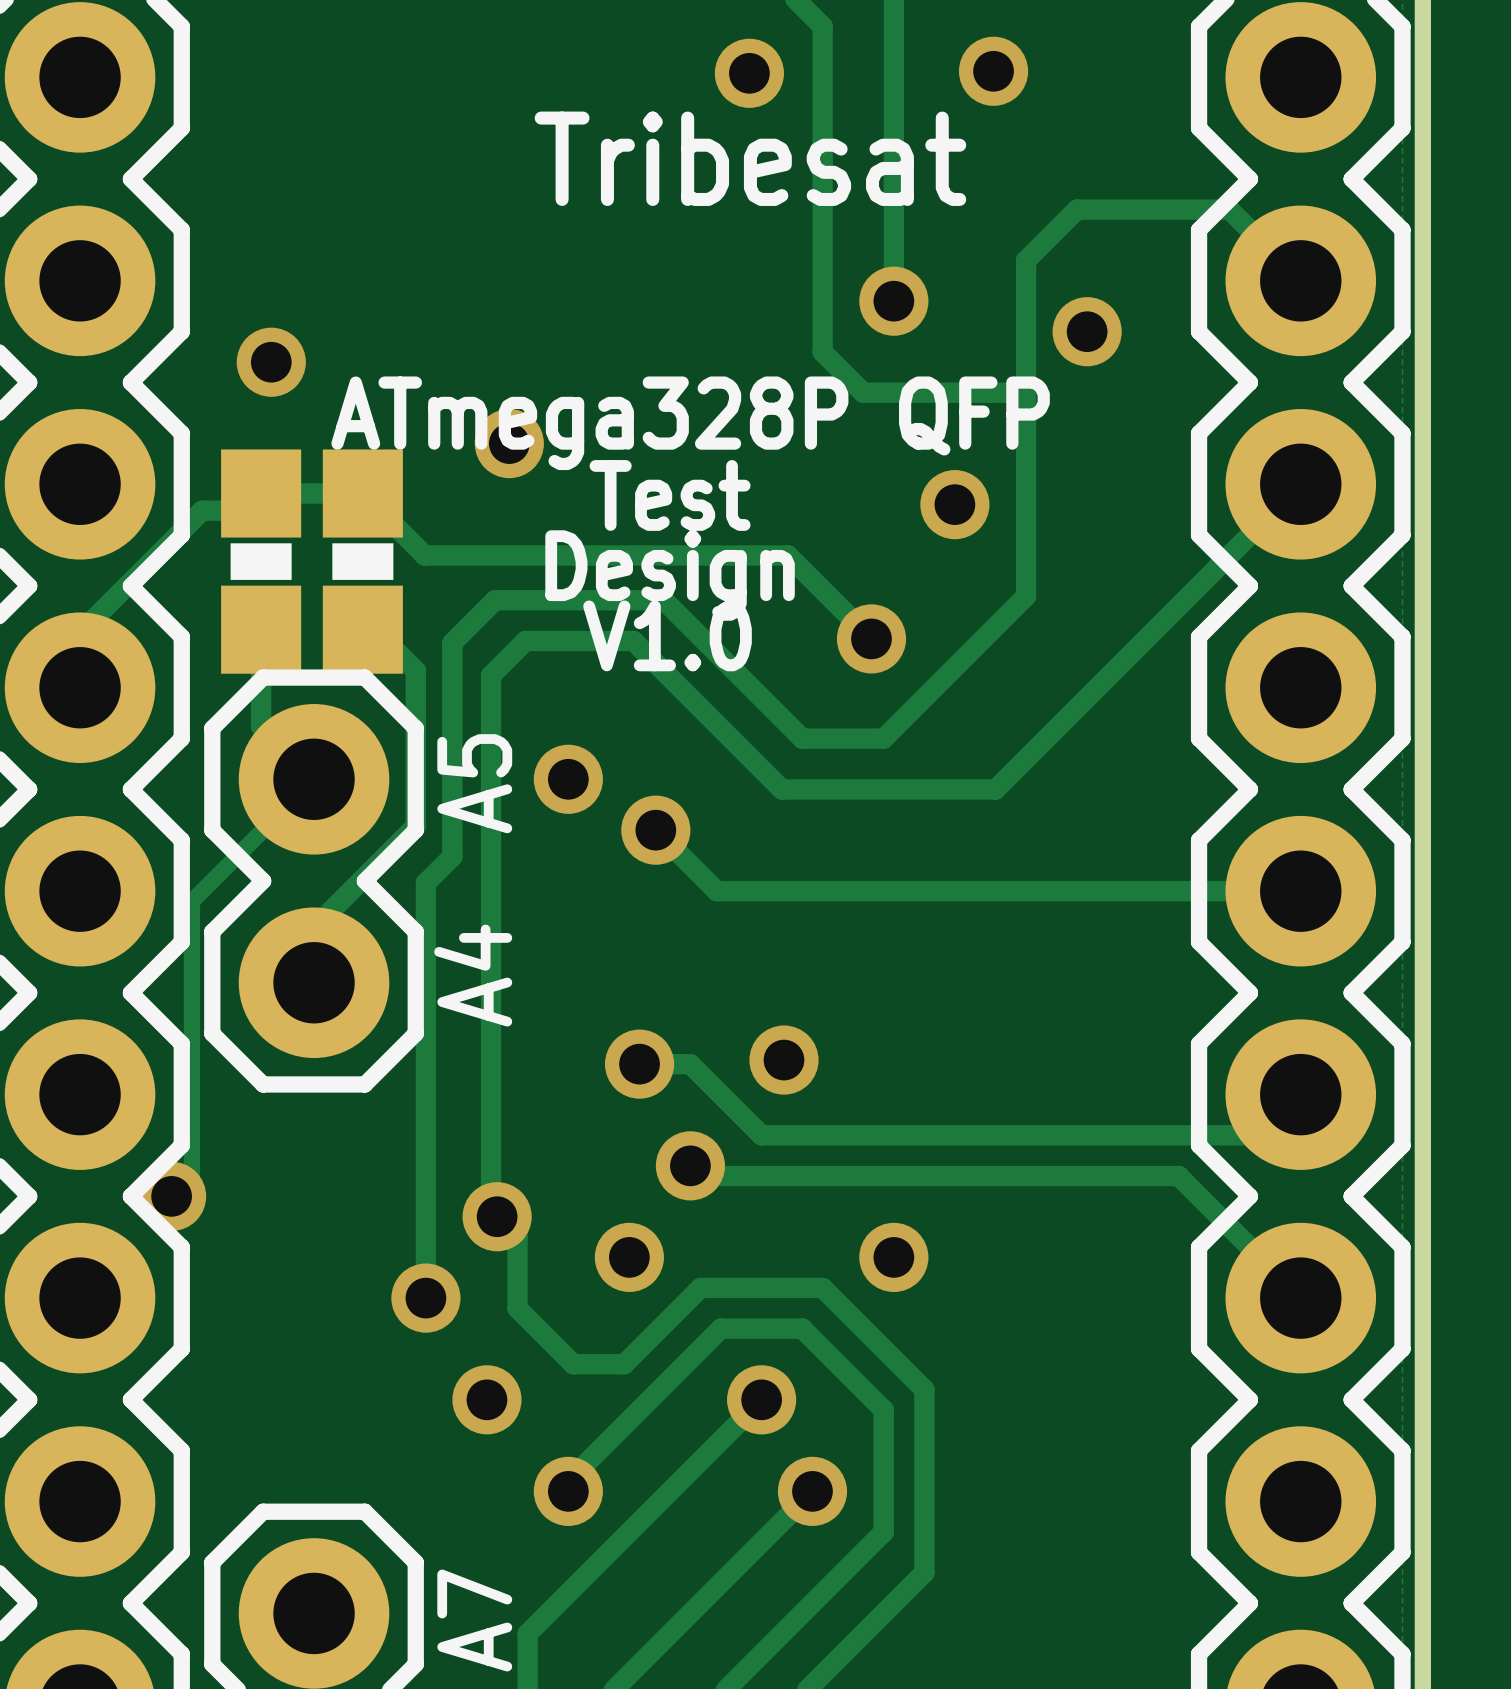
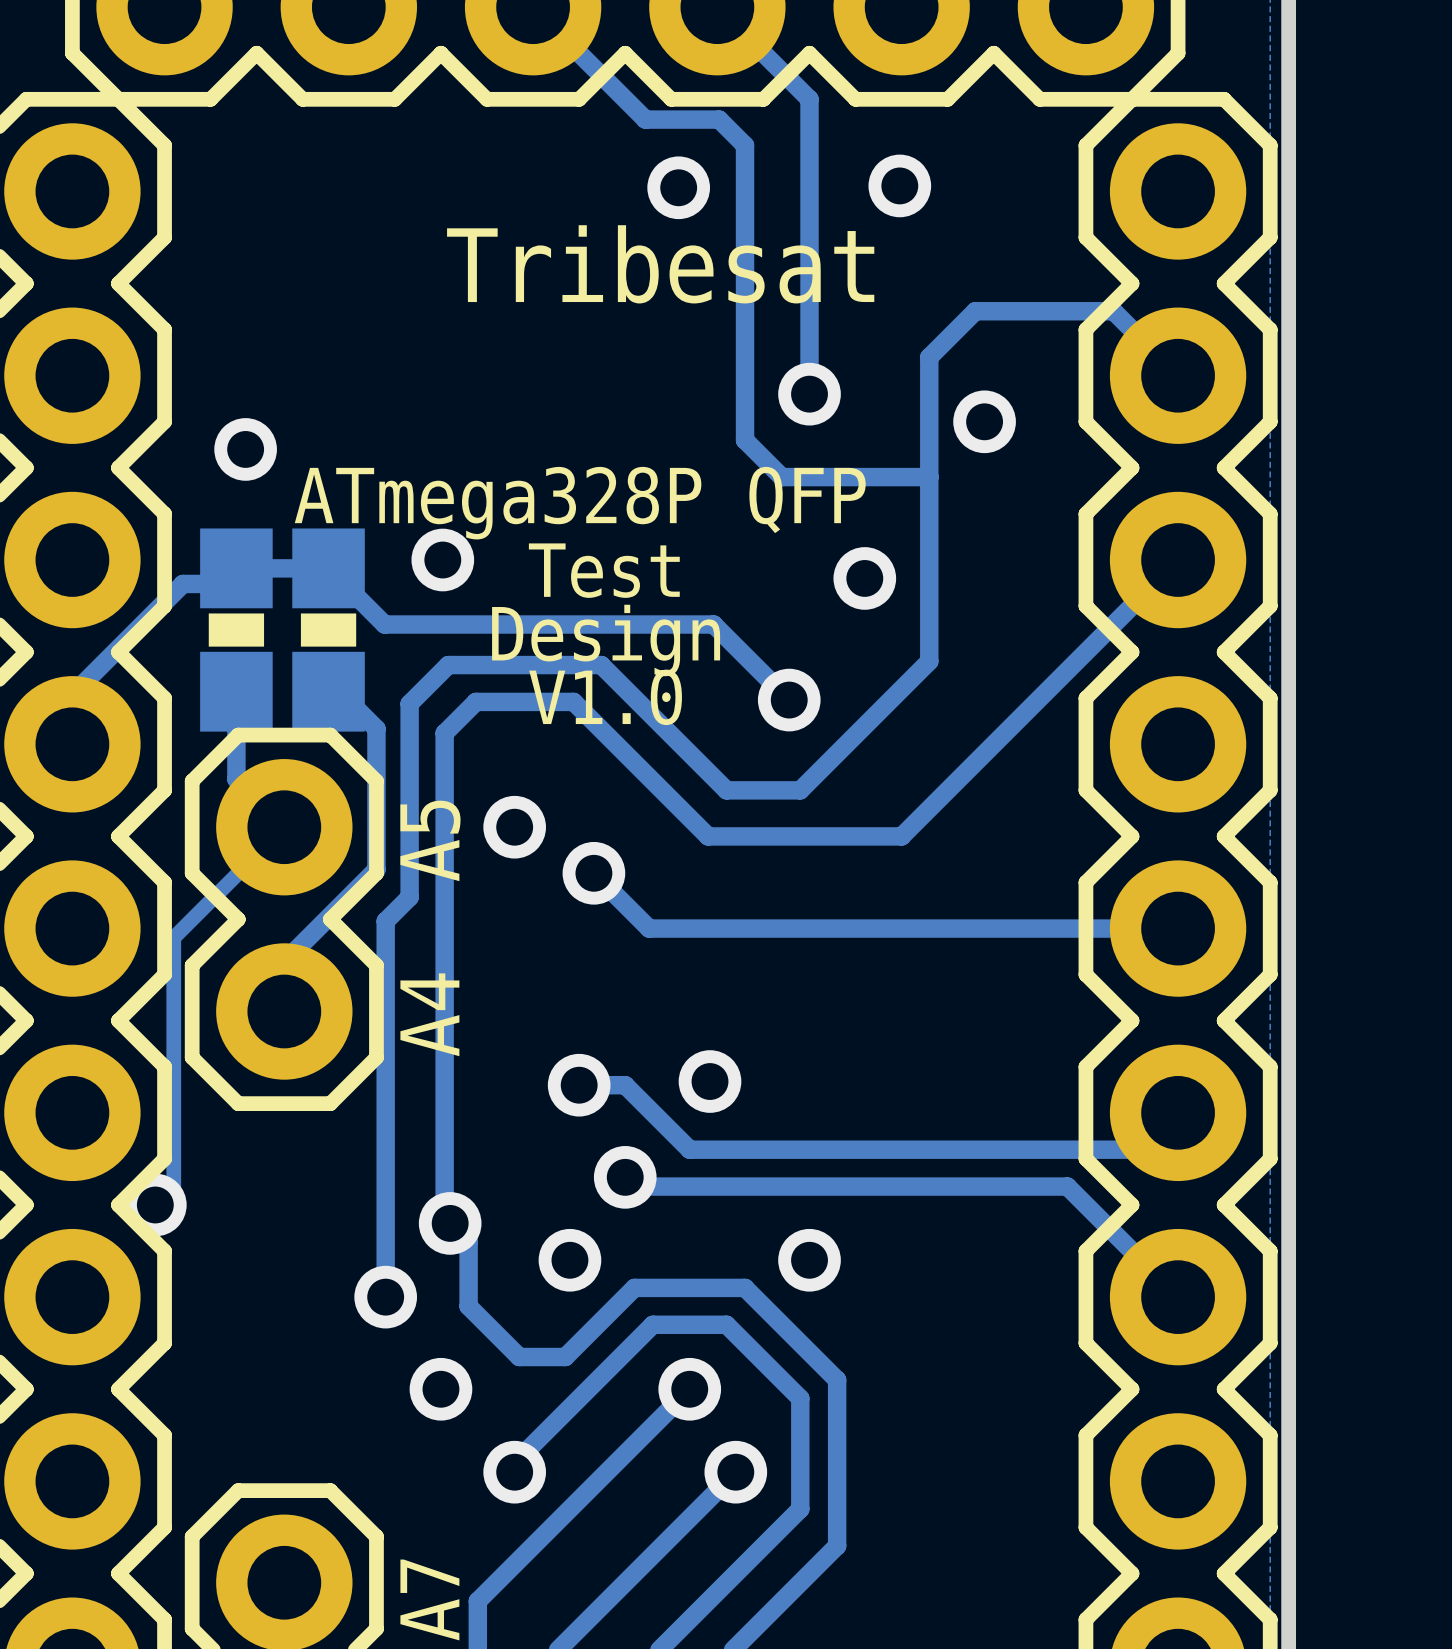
via position: (509, 443) -> (442, 560)

